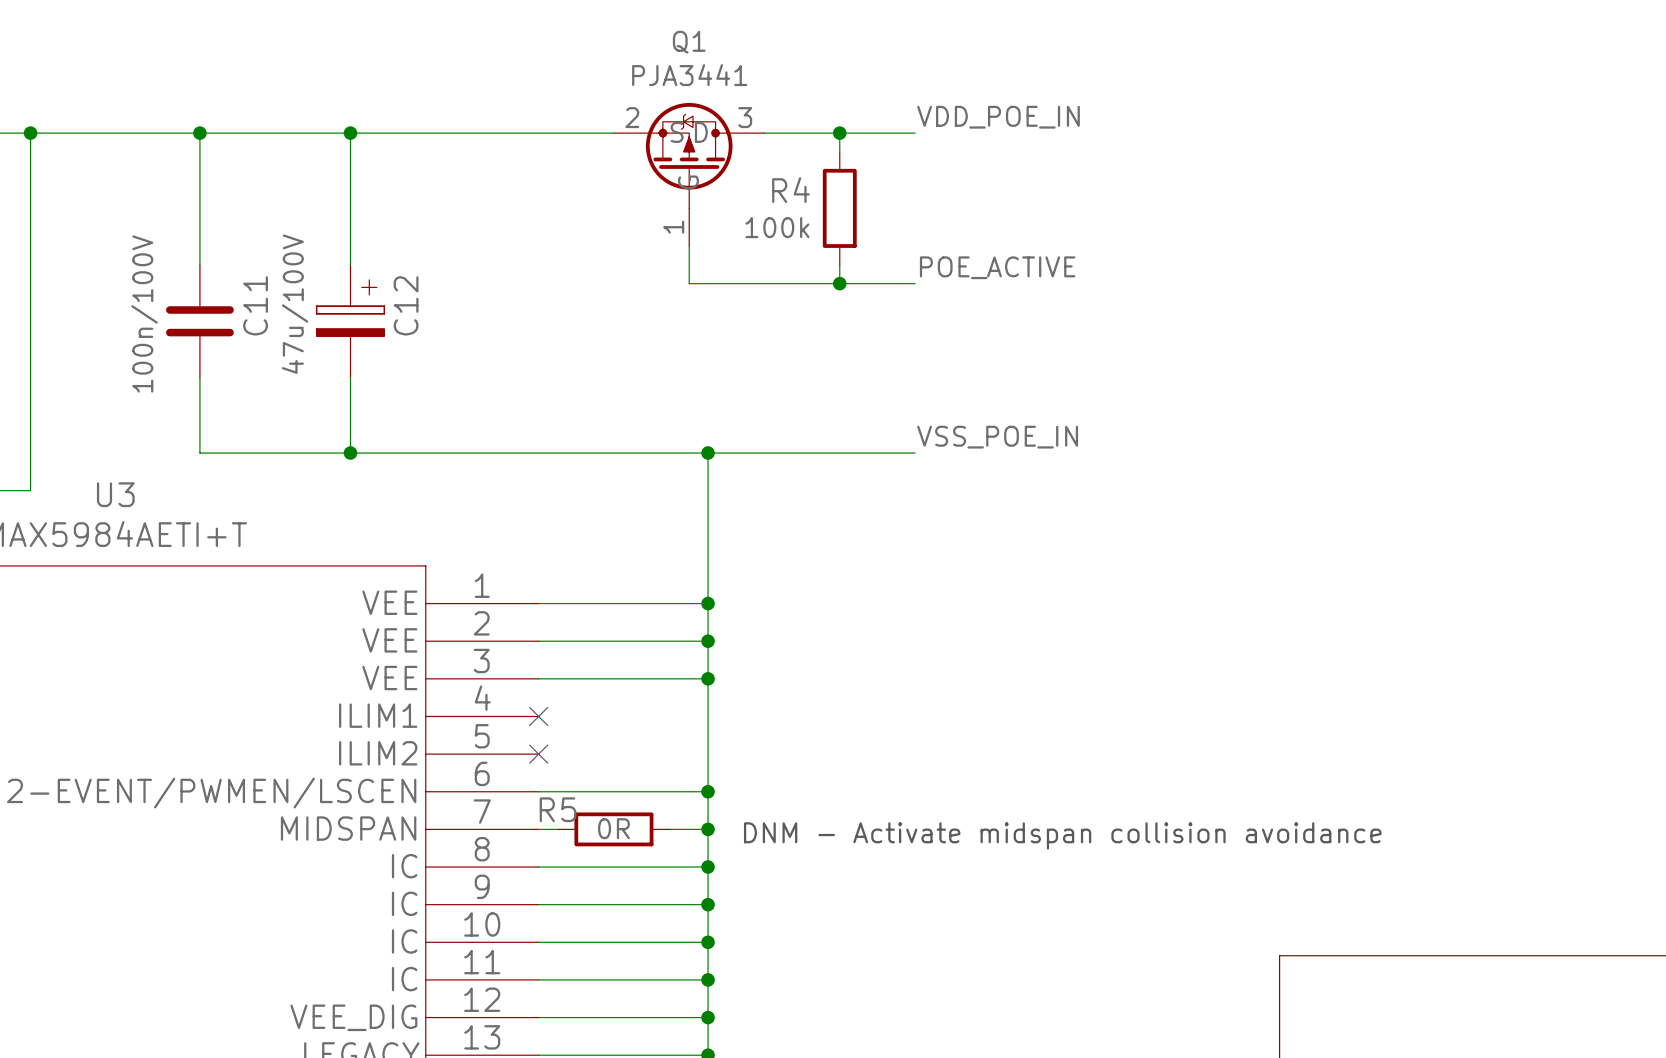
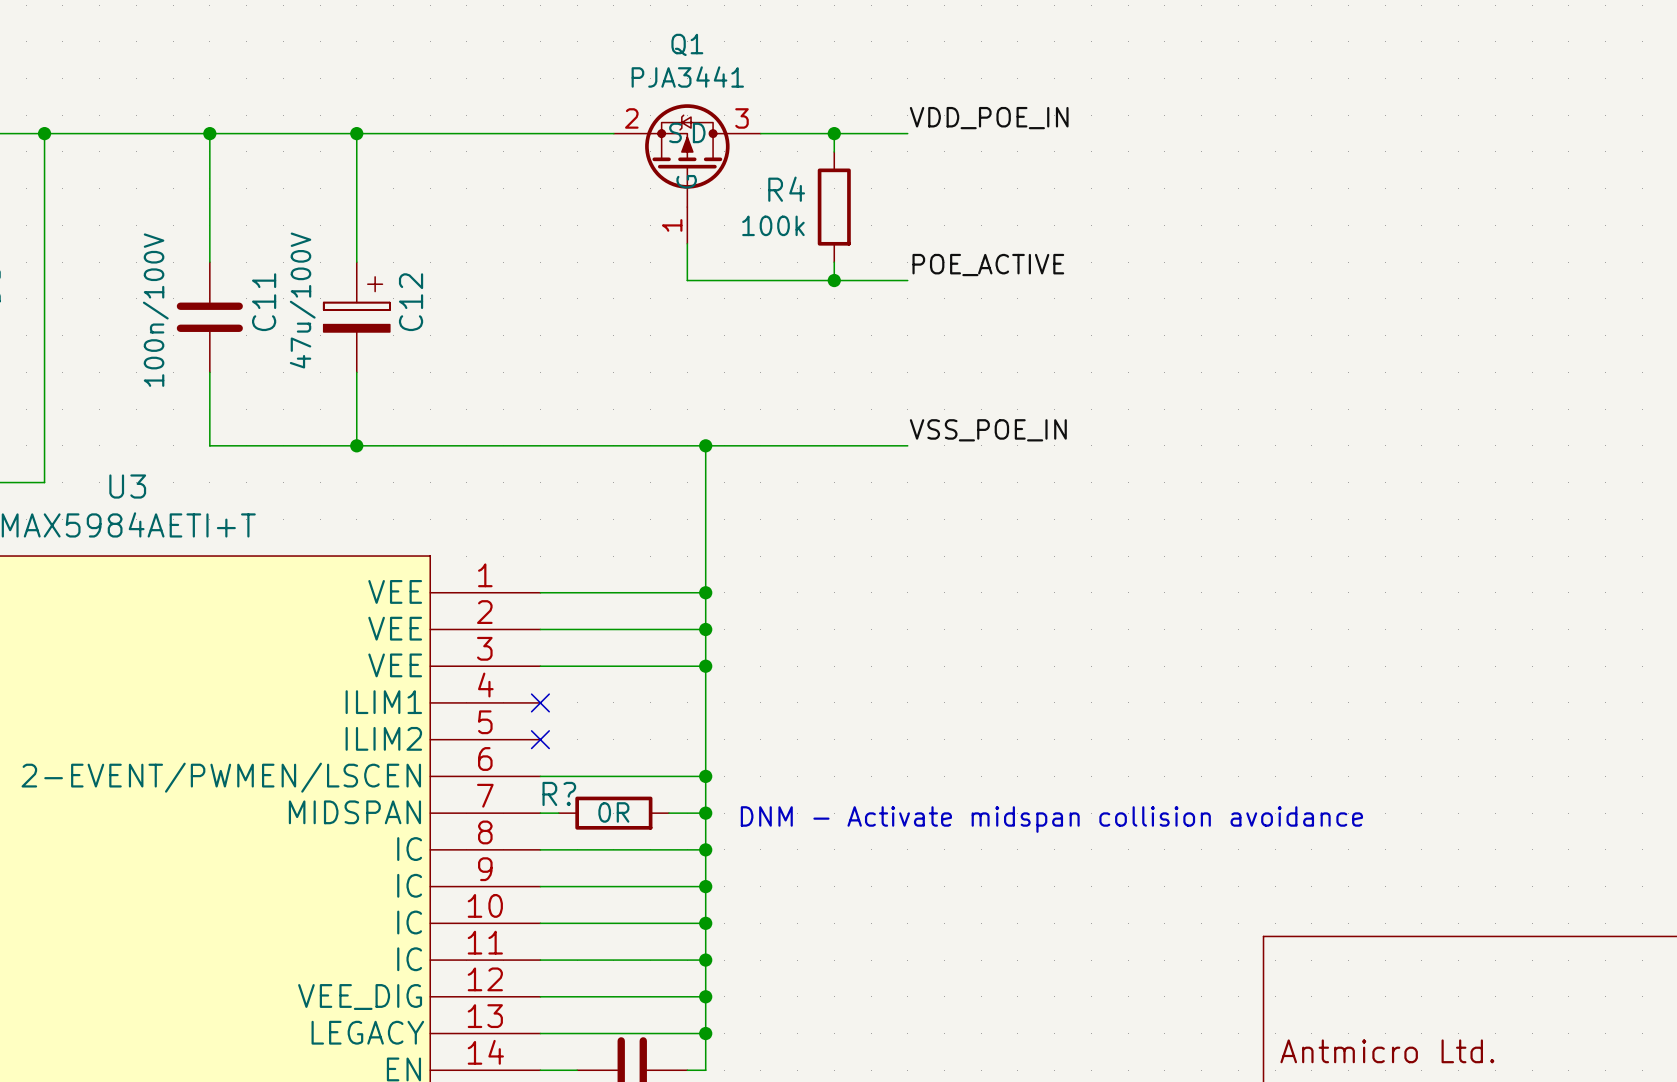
R5 name: R5 (558, 809) -> R? (559, 793)

